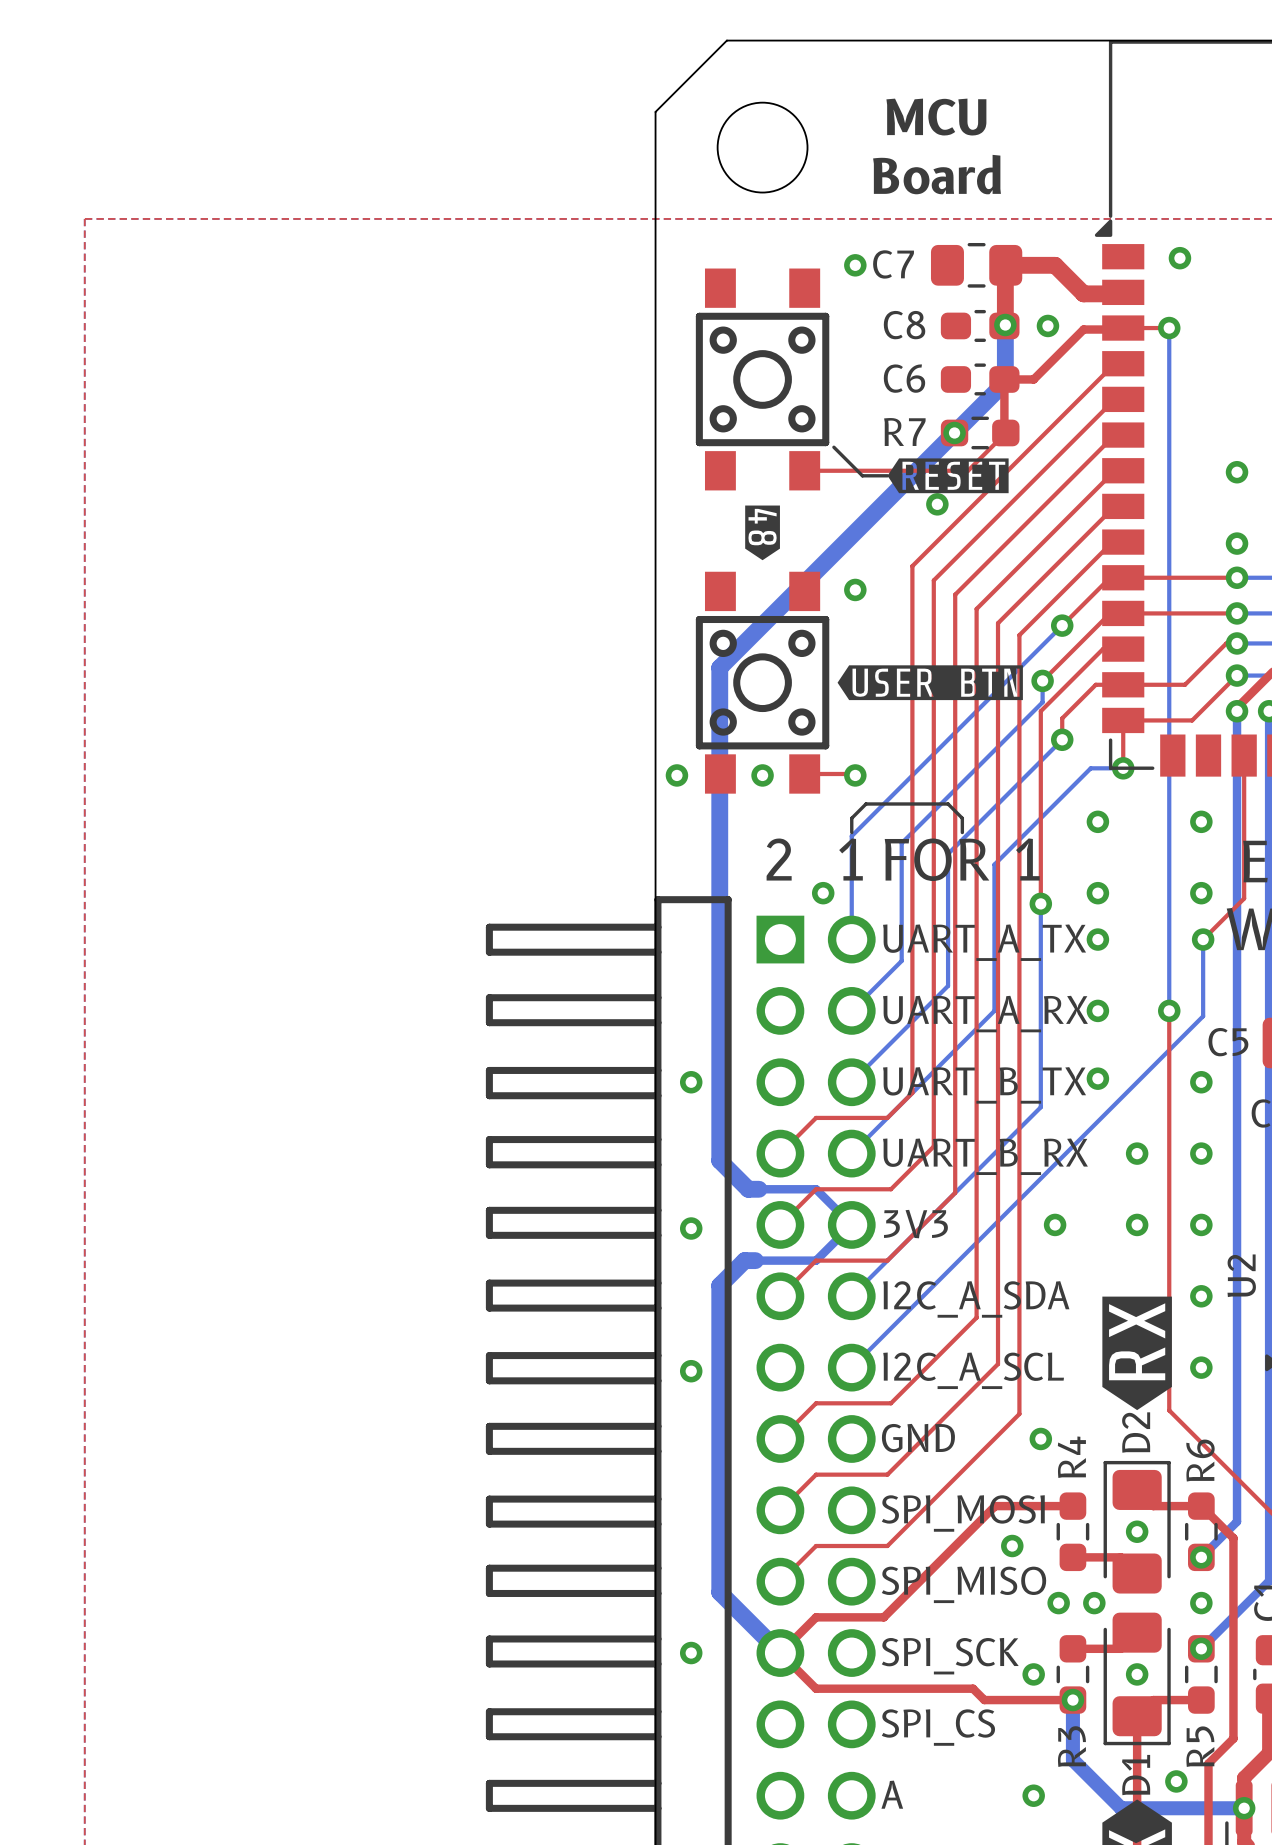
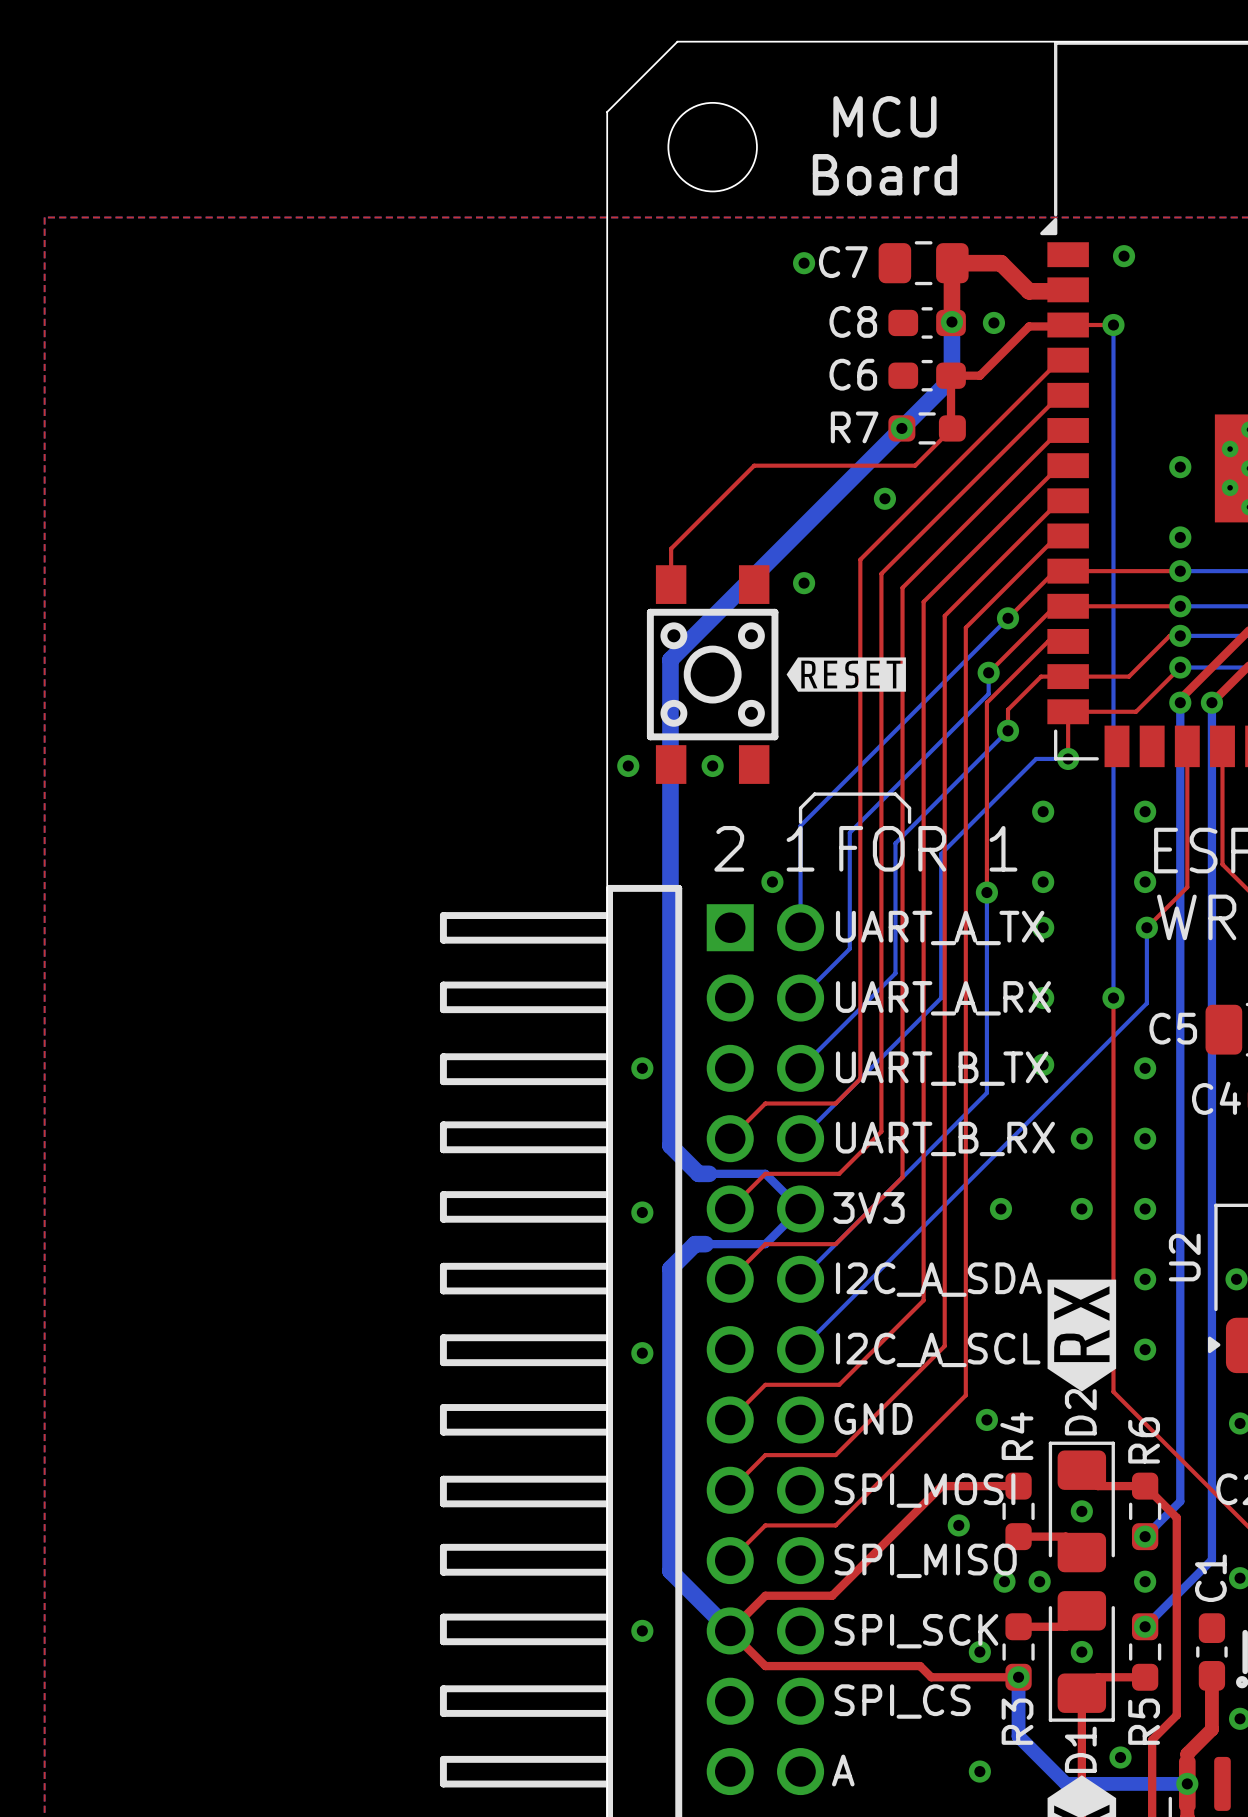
part: (762, 379) -> none
line: (833, 447) (862, 475) (887, 475) -> none
top track: none -> (754, 465) (671, 548) (671, 584)
drawing position: (948, 475) -> (846, 674)
drawing: [745, 505, 780, 561] -> none
drawing: [837, 665, 1023, 701] -> none
top track: (804, 773) (855, 775) -> none
via: (855, 775) -> none

